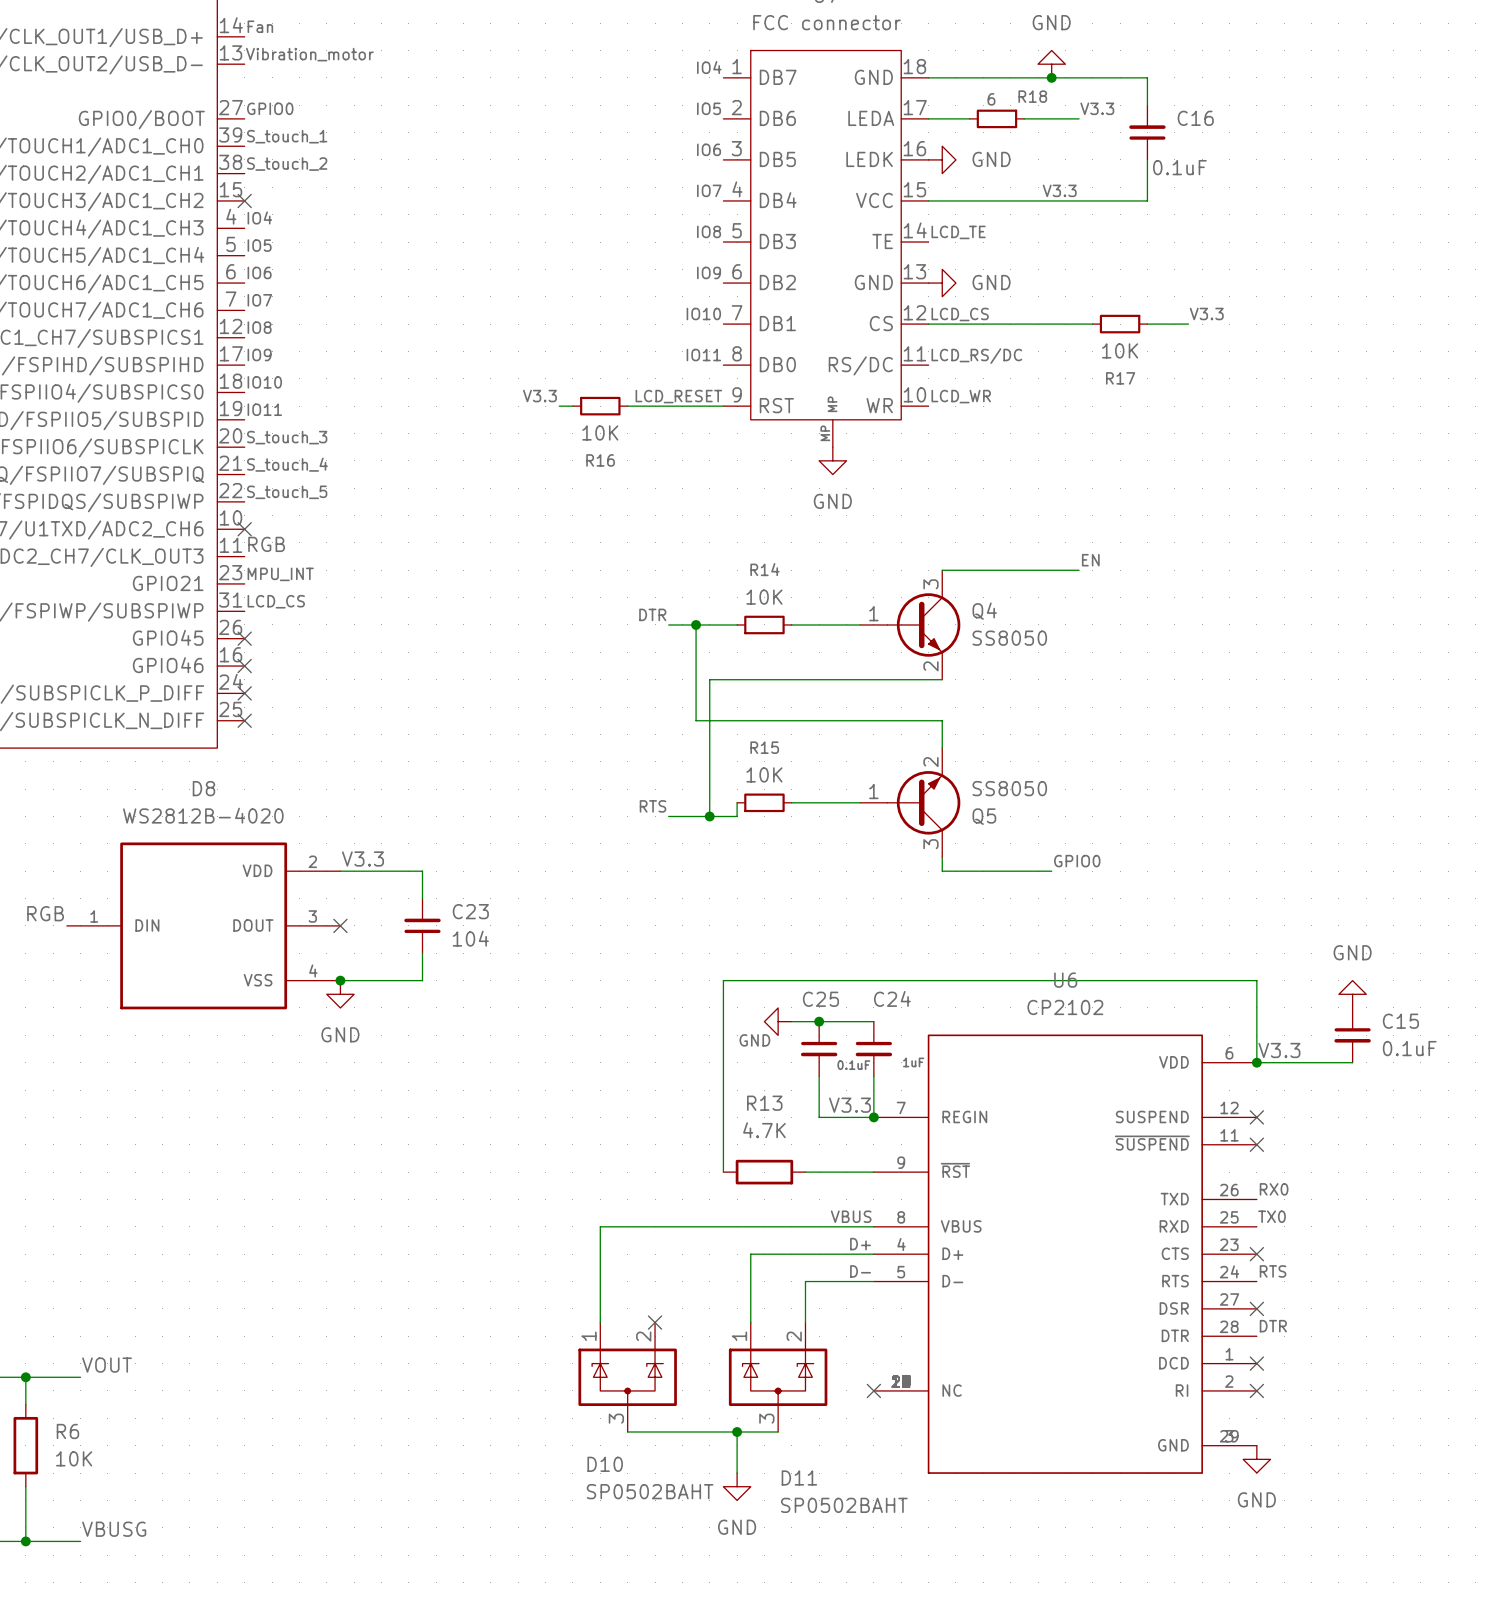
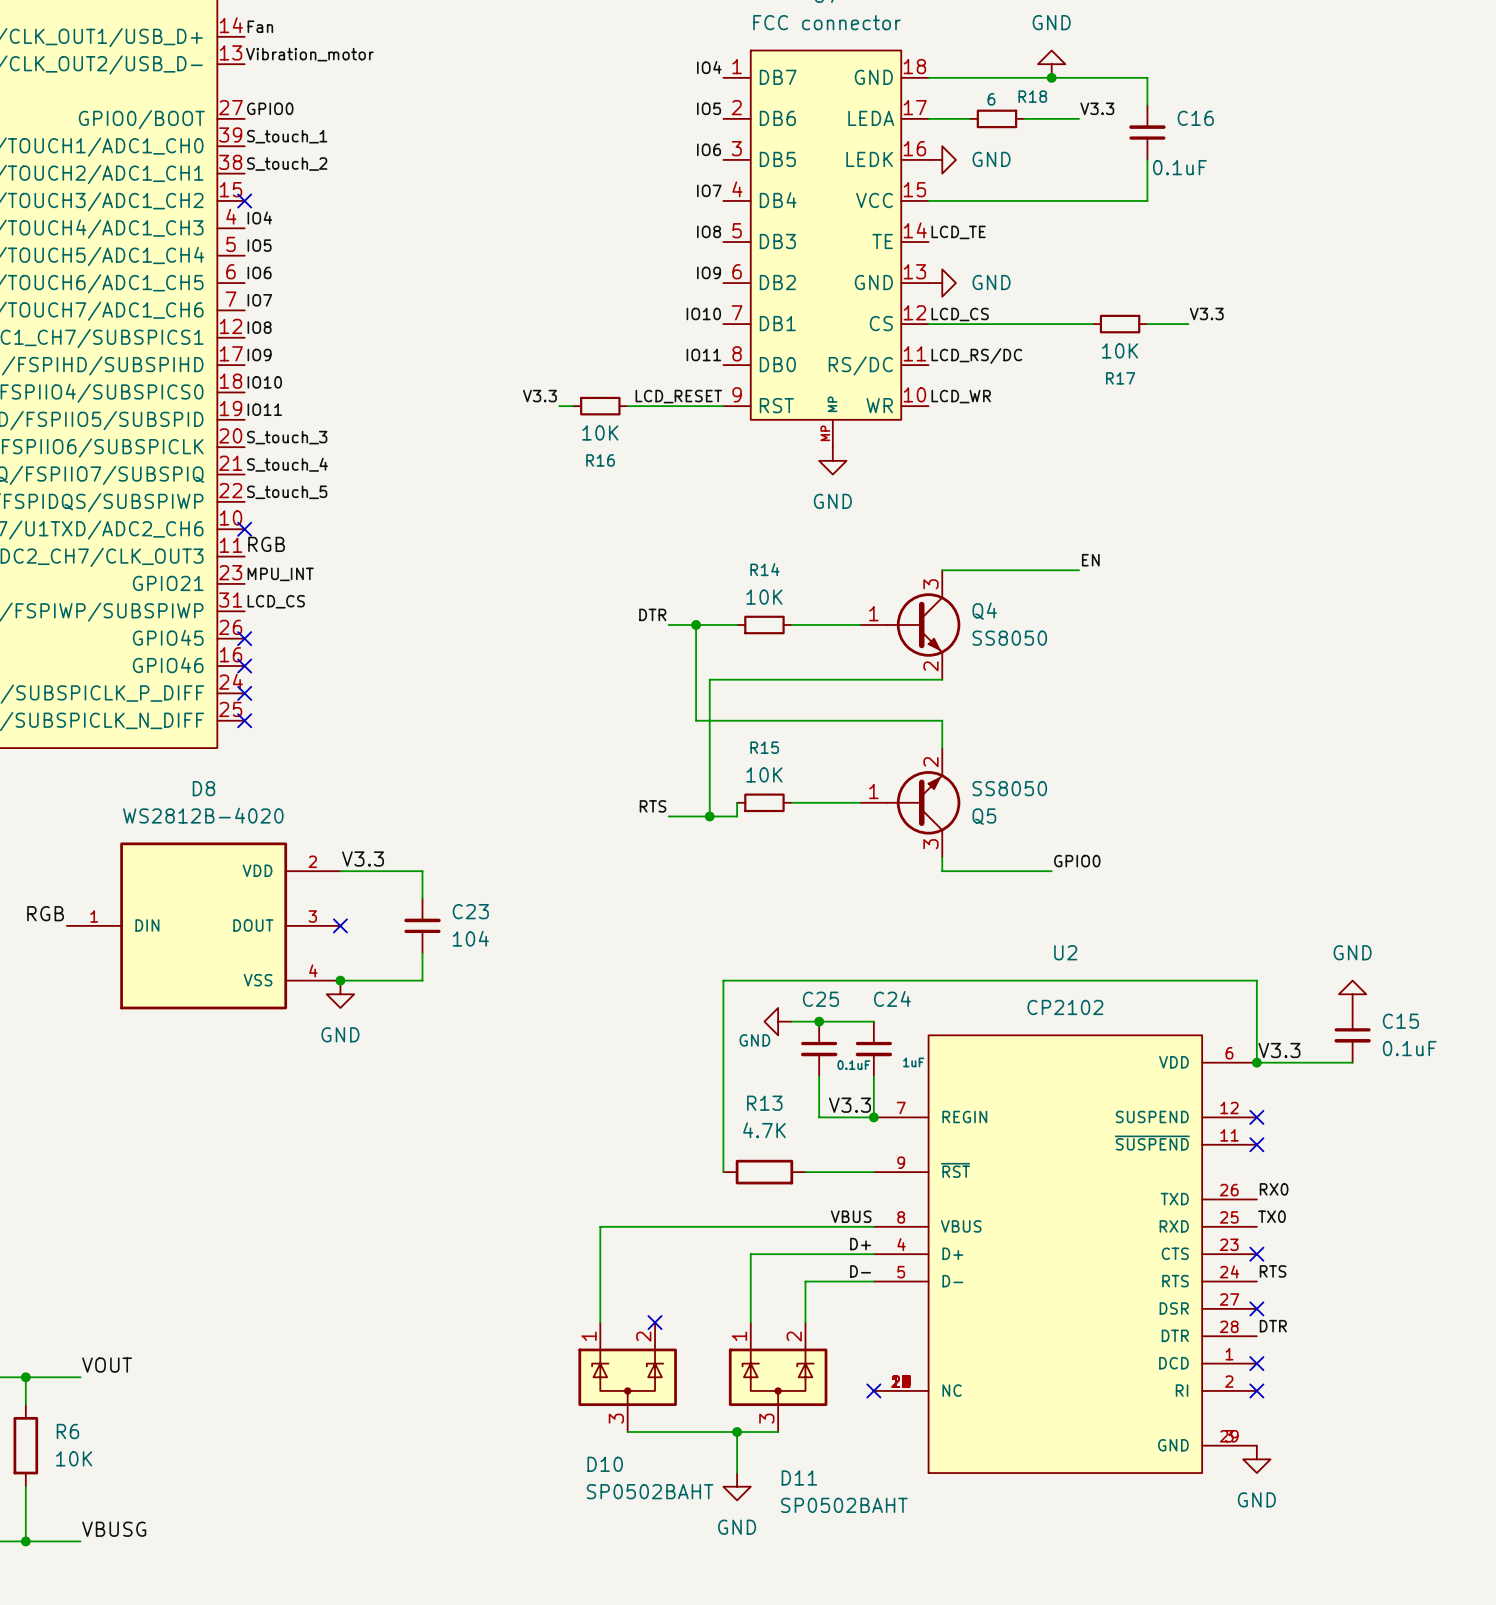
label: V3.3 (1059, 190) -> none
U6 name: U6 (1065, 980) -> U2 (1065, 952)

